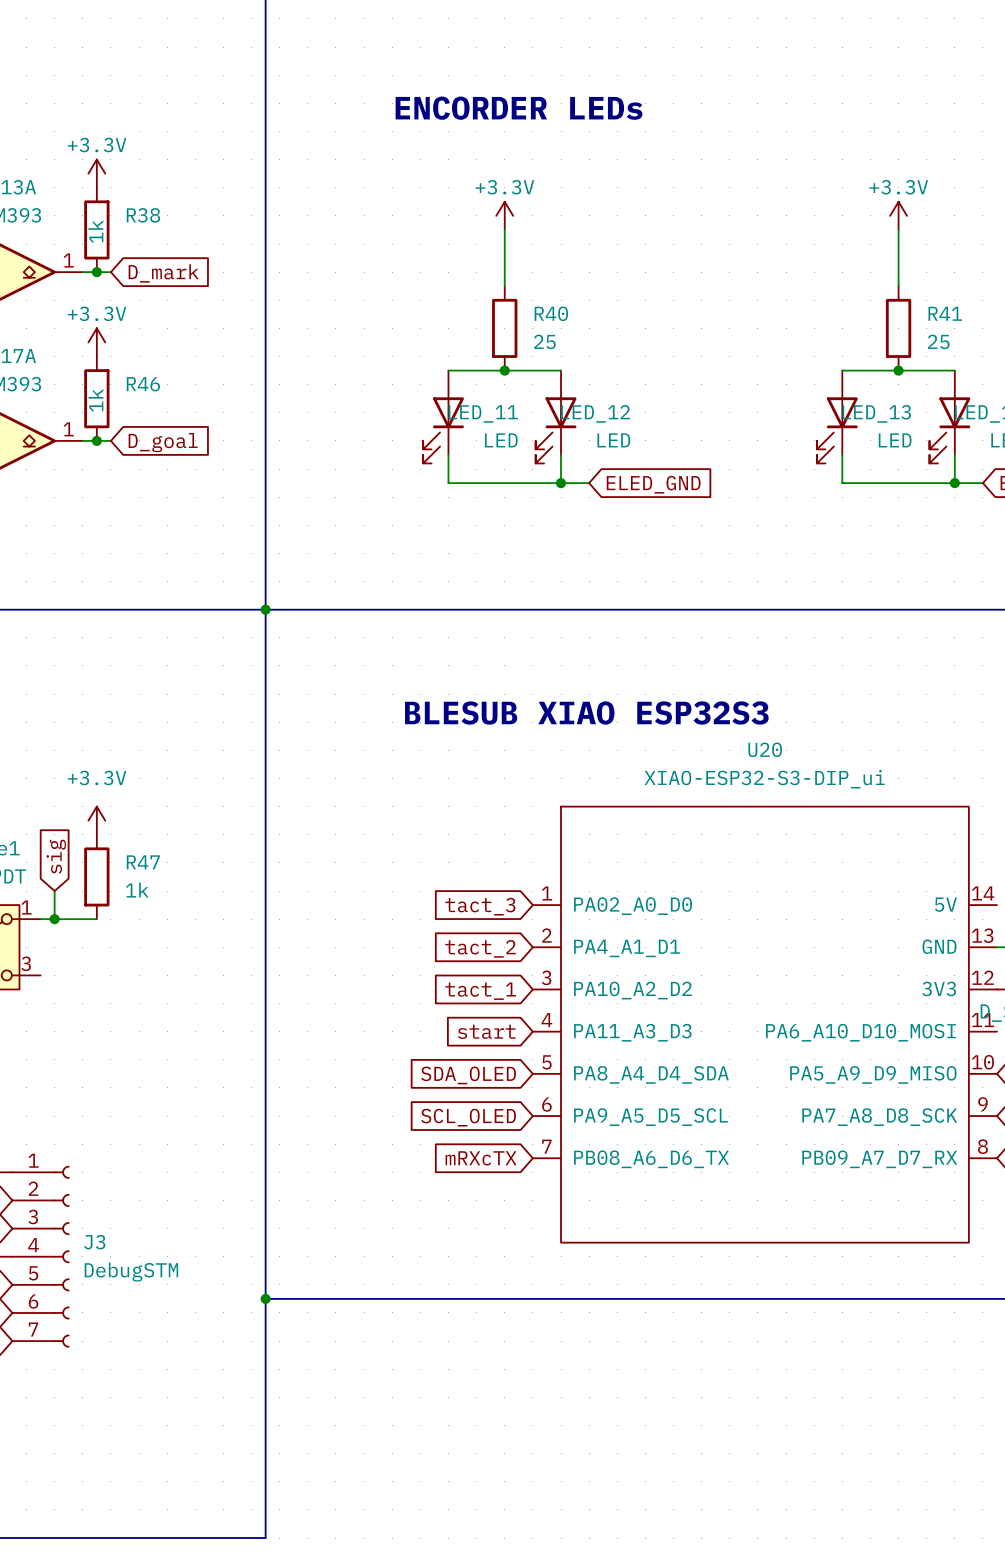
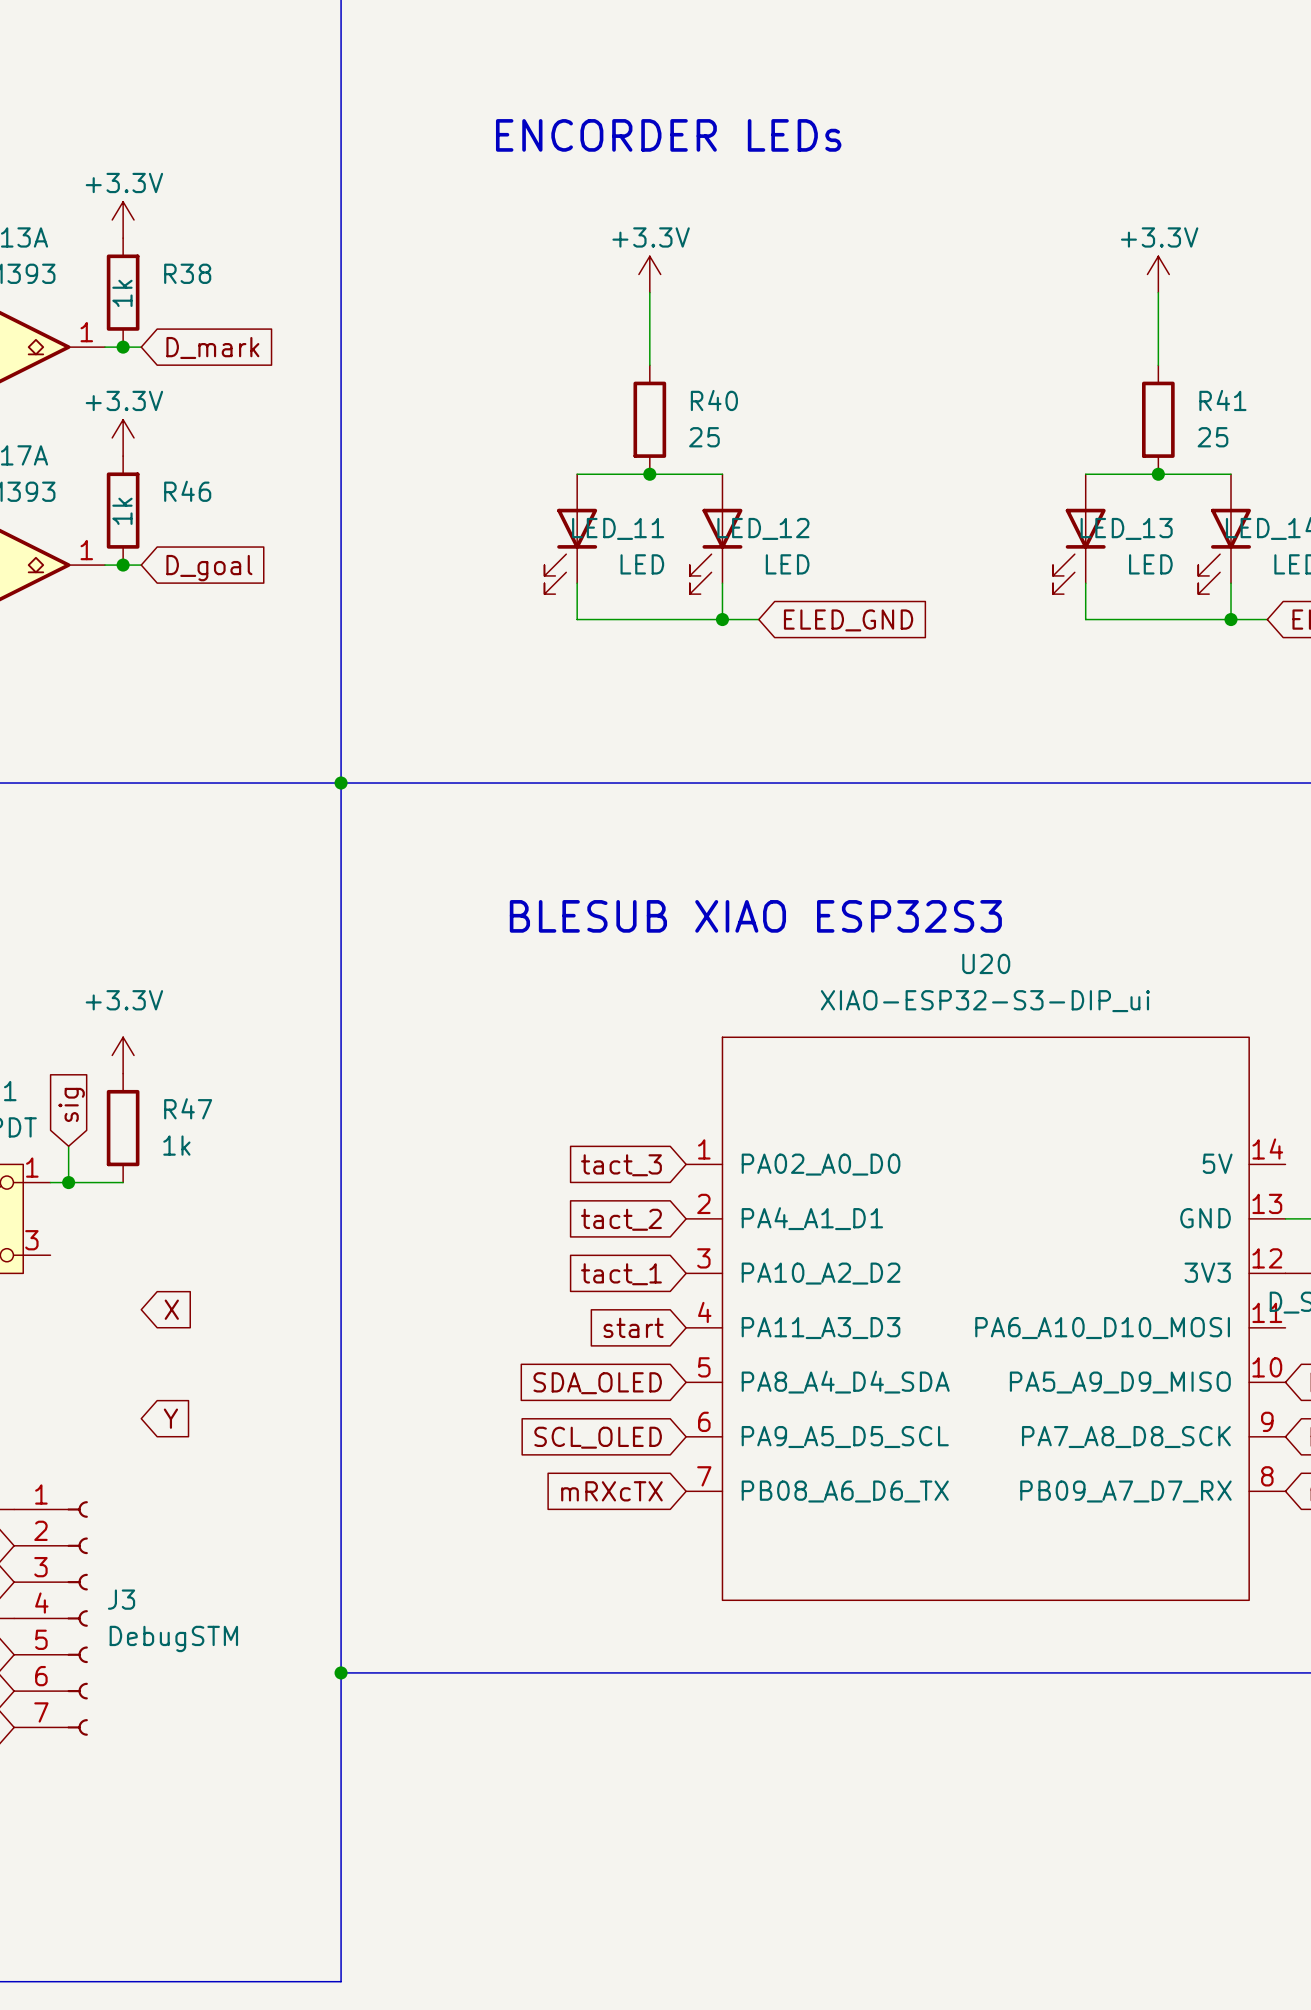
global label: none -> X (171, 1309)
global label: none -> Y (170, 1418)

